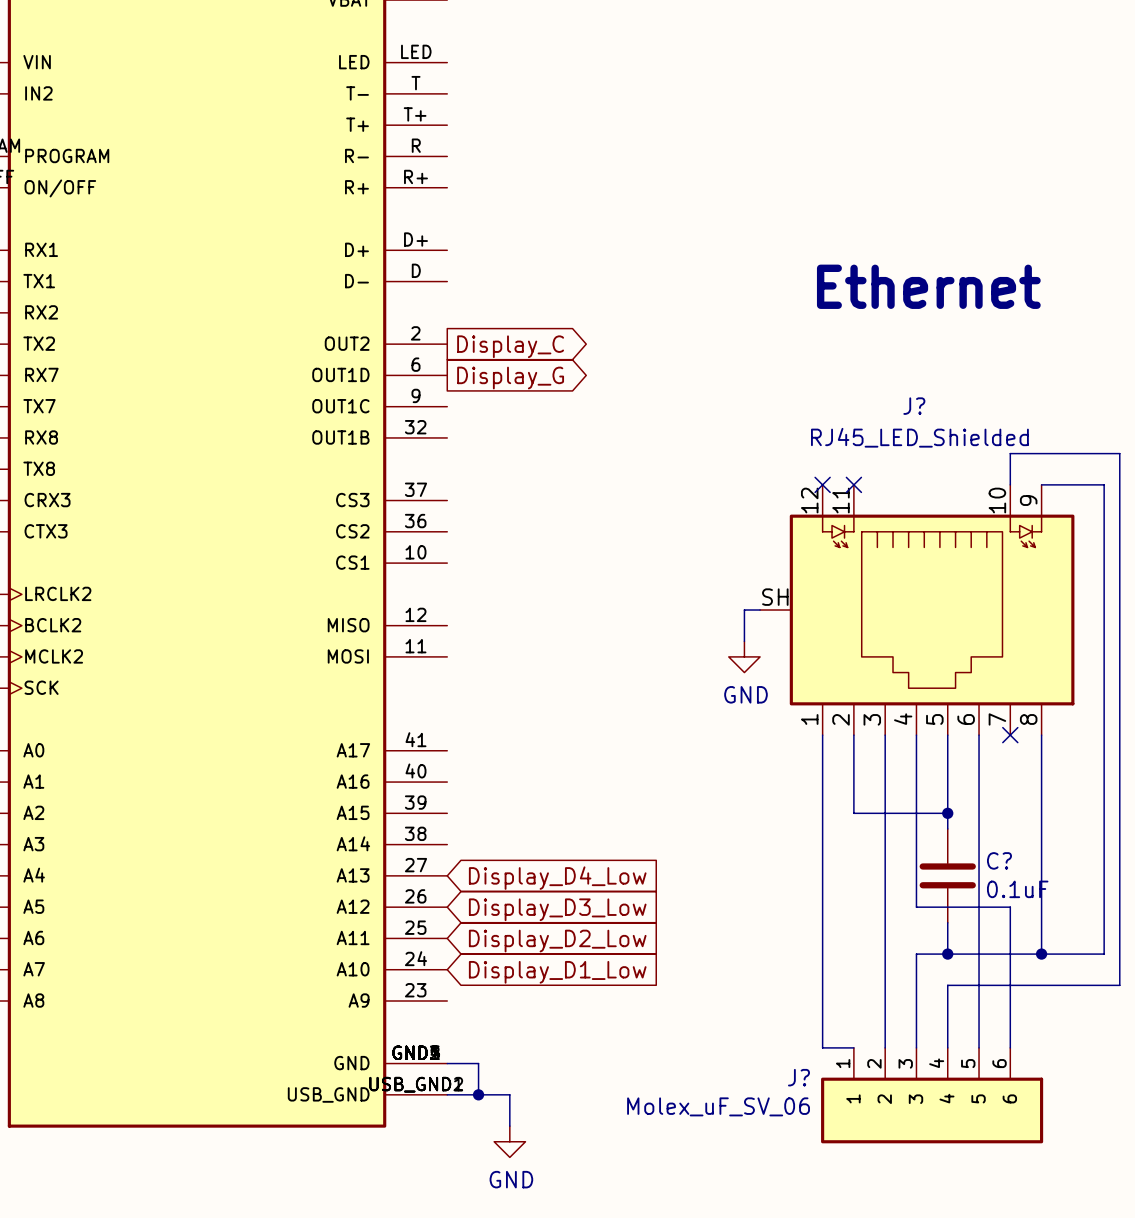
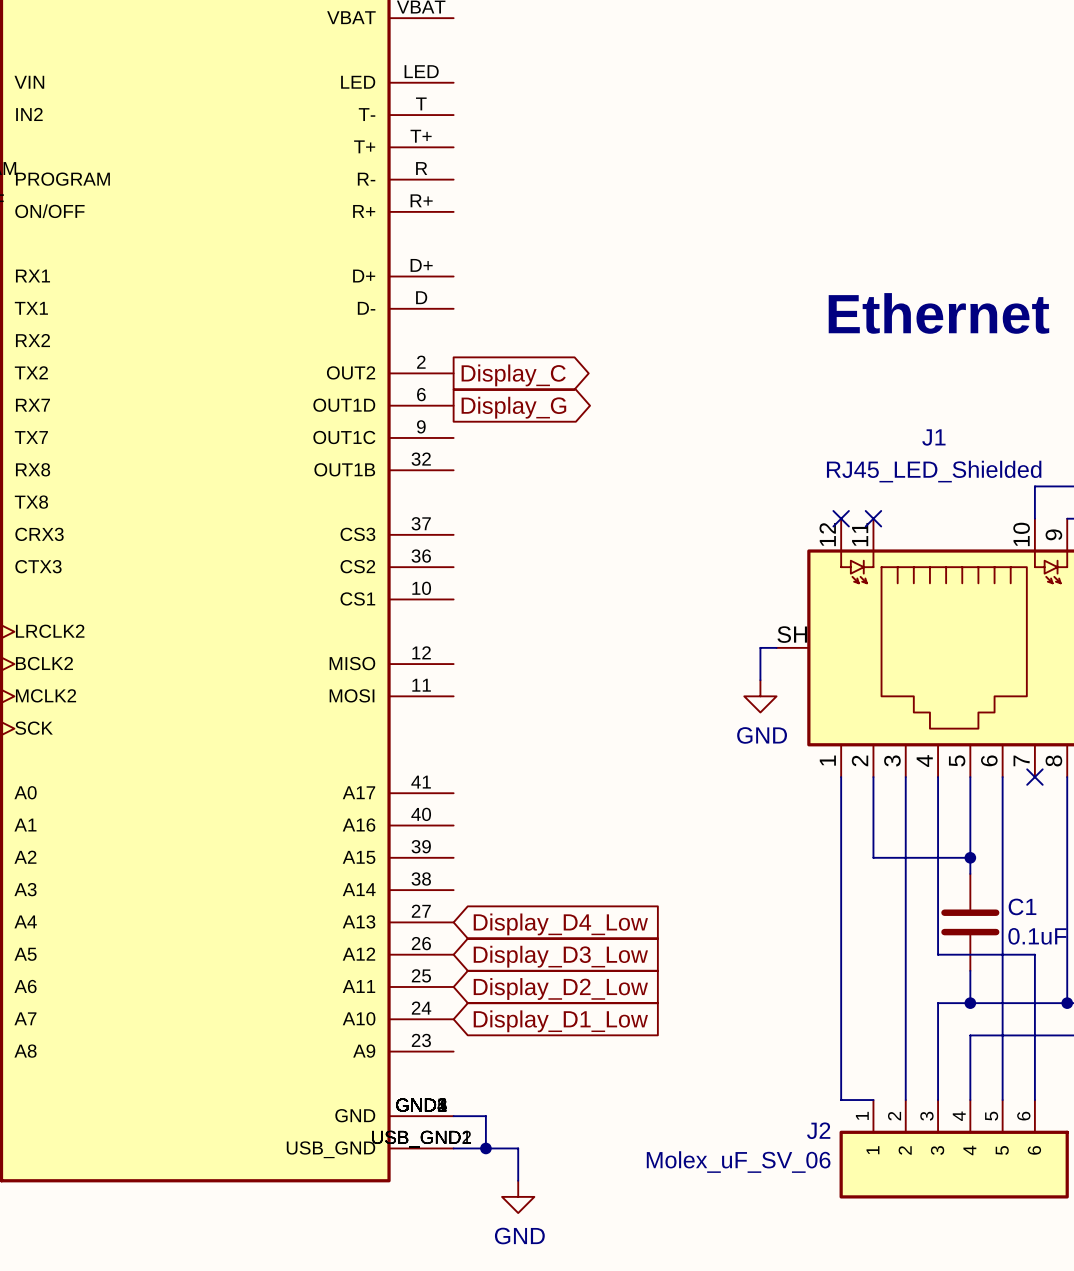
J? name: J? (914, 406) -> J1 (933, 437)
C? name: C? (999, 860) -> C1 (1022, 906)
J? name: J? (798, 1077) -> J2 (818, 1130)

